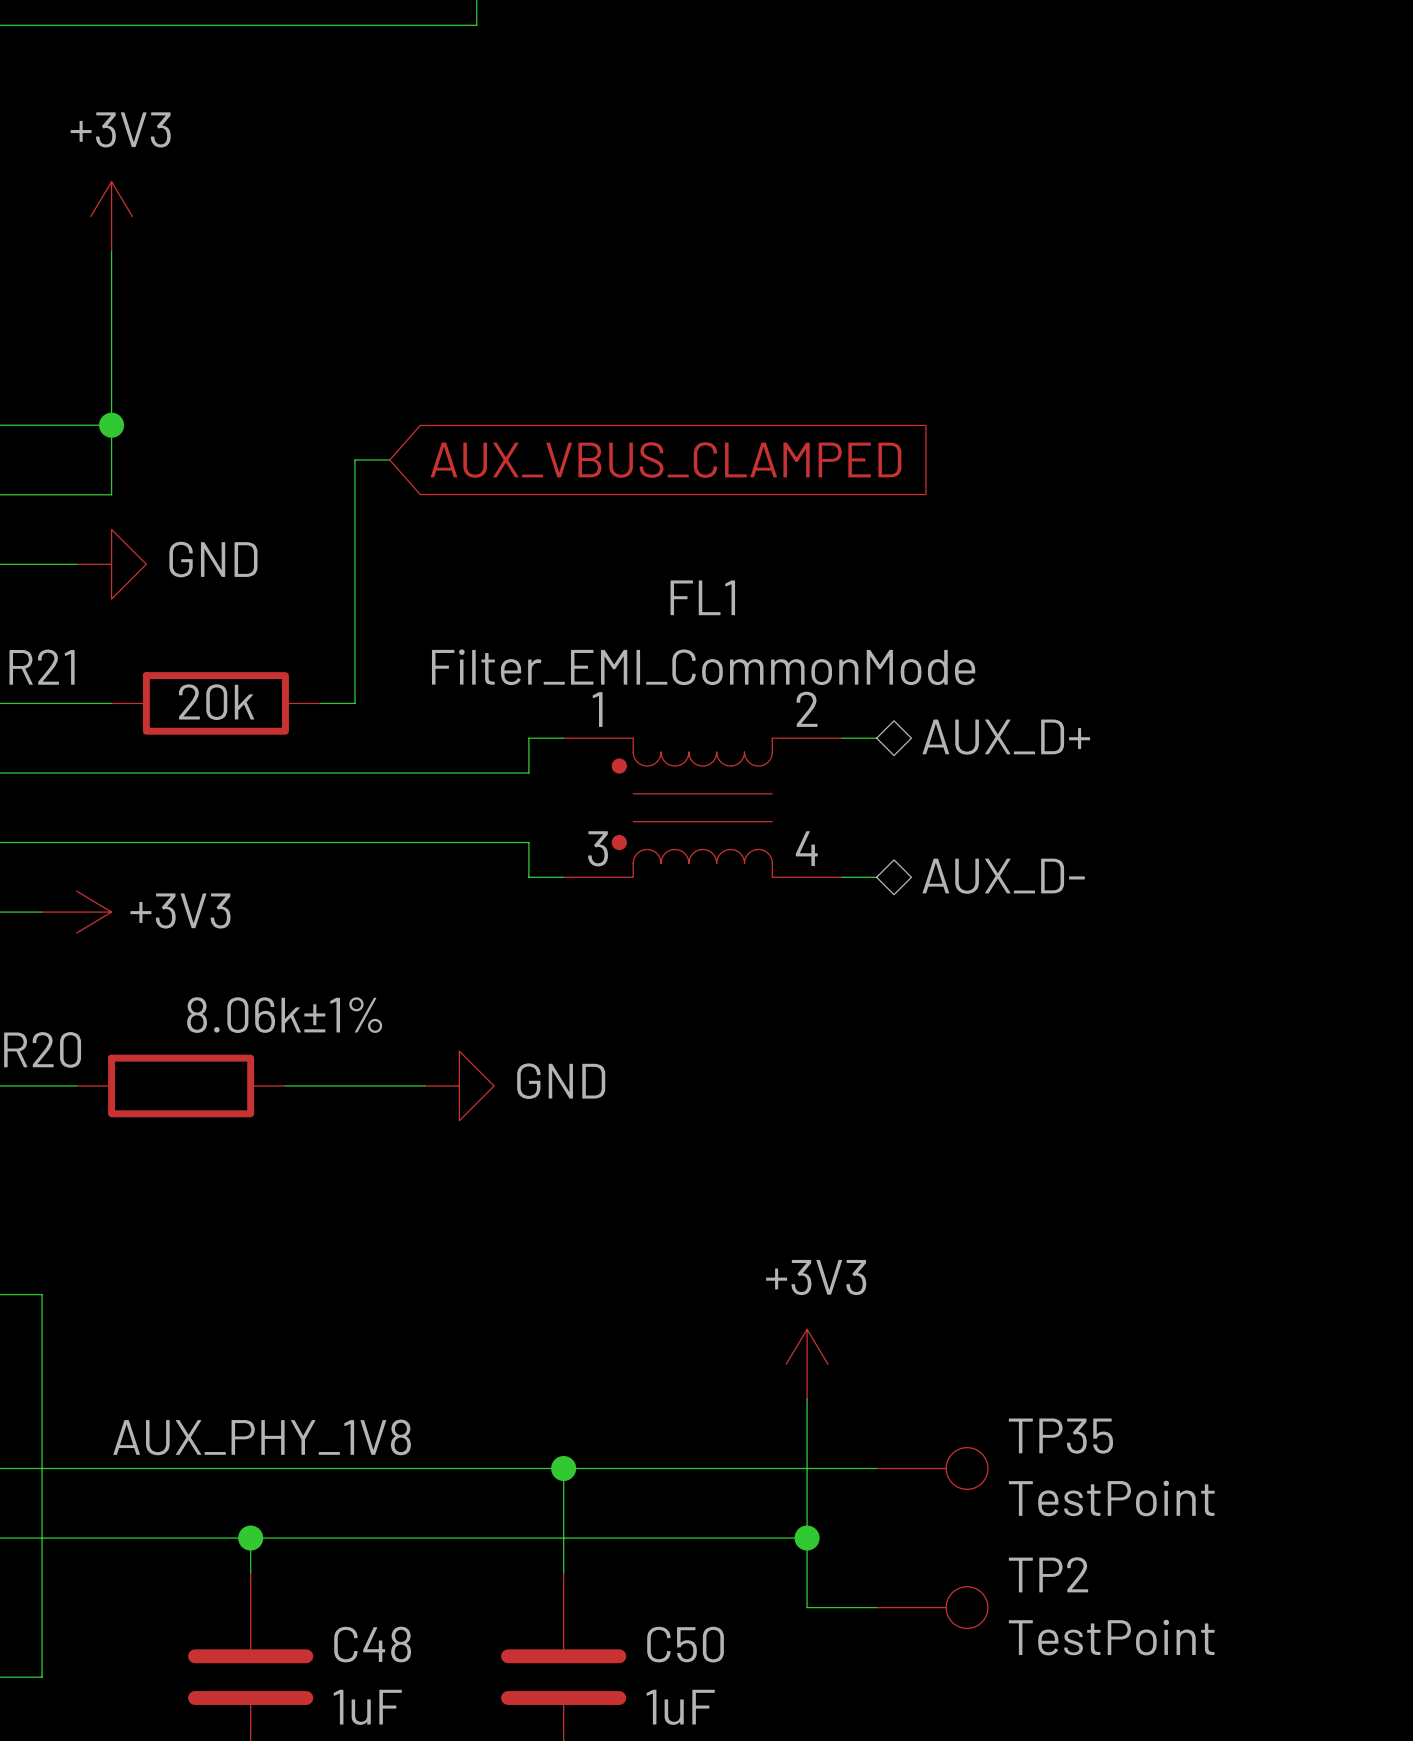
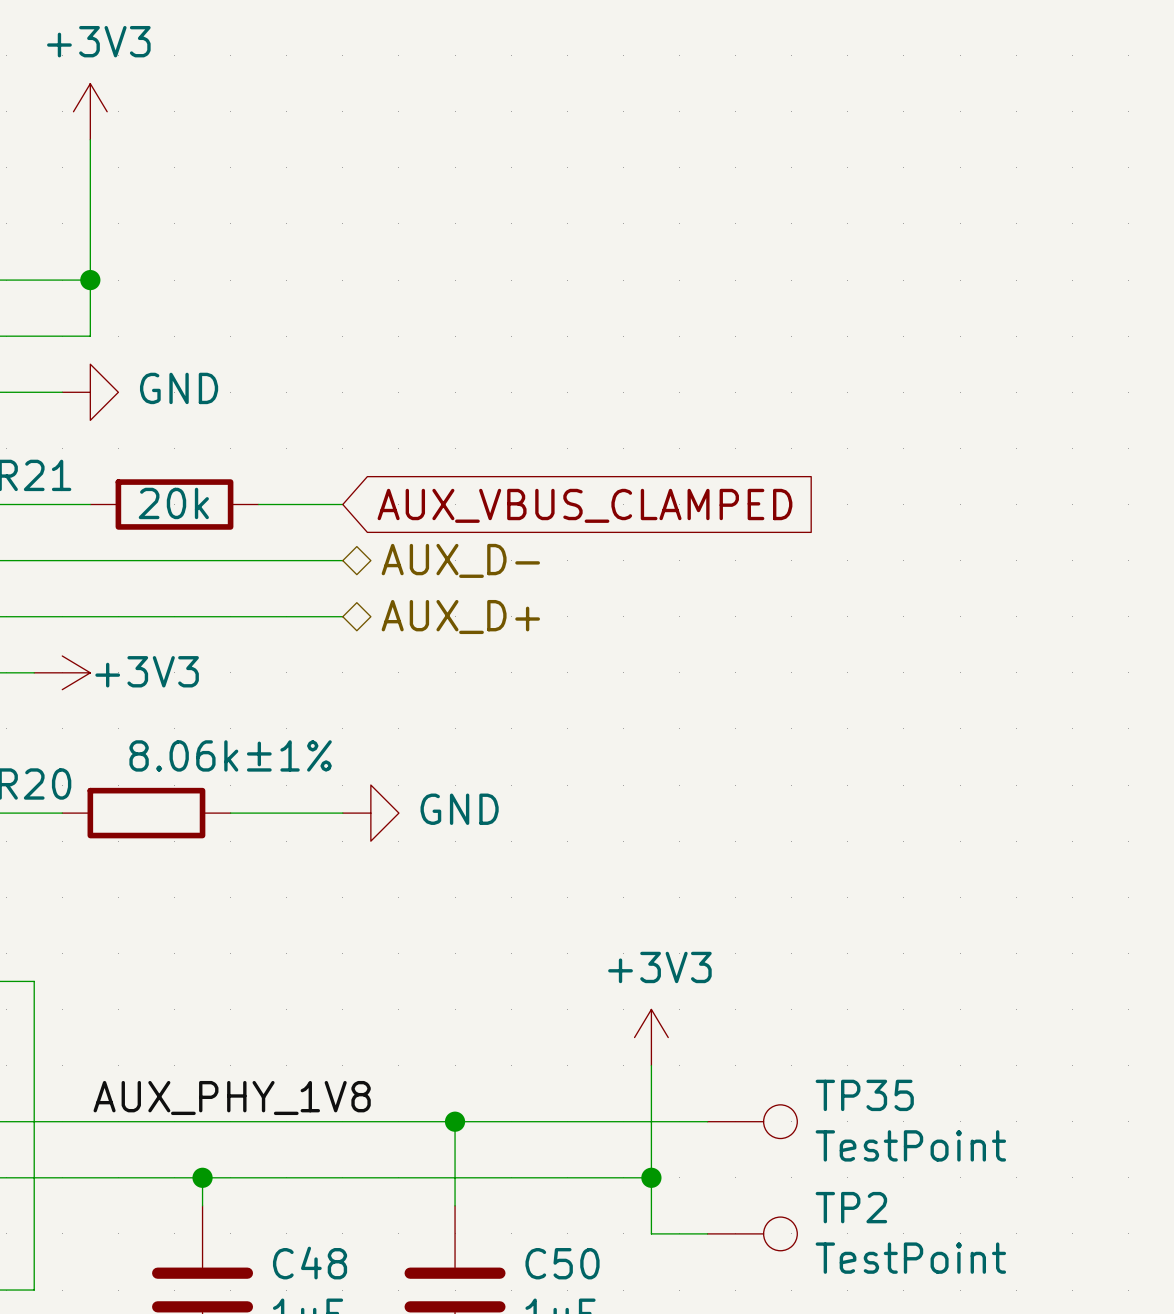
wire: (389, 460) (355, 460) (355, 703) -> (342, 504) (286, 504)
global label position: AUX_VBUS_CLAMPED (665, 460) -> AUX_VBUS_CLAMPED (584, 505)
hierarchical label position: AUX_D+ (1006, 737) -> AUX_D+ (460, 617)
wire: (563, 738) (528, 738) (528, 772) (424, 772) -> none
FL1: Filter_EMI_CommonMode (702, 807) -> none
wire: (424, 842) (528, 842) (528, 877) (563, 877) -> none
hierarchical label position: AUX_D- (1003, 876) -> AUX_D- (460, 560)
wire: (841, 877) (876, 877) -> none

